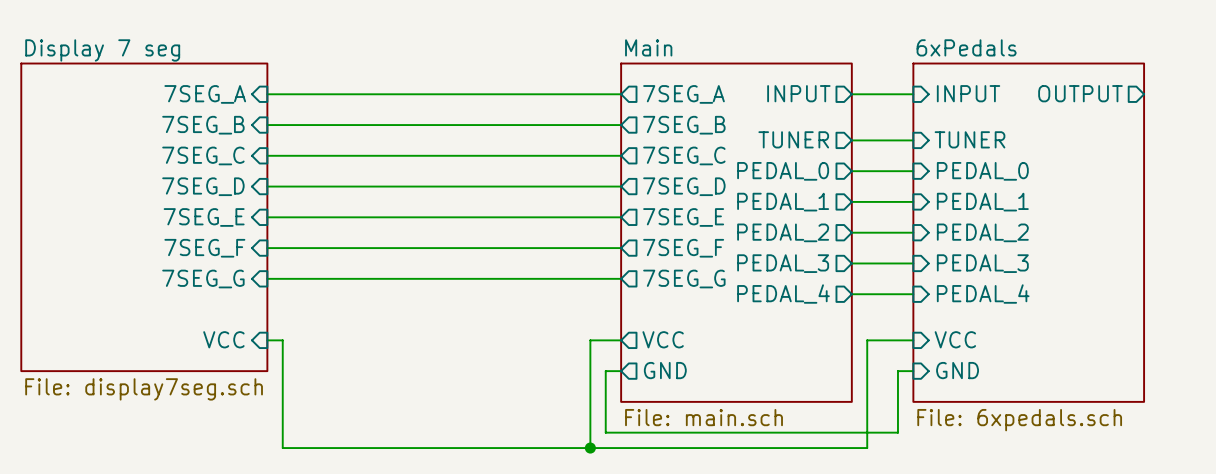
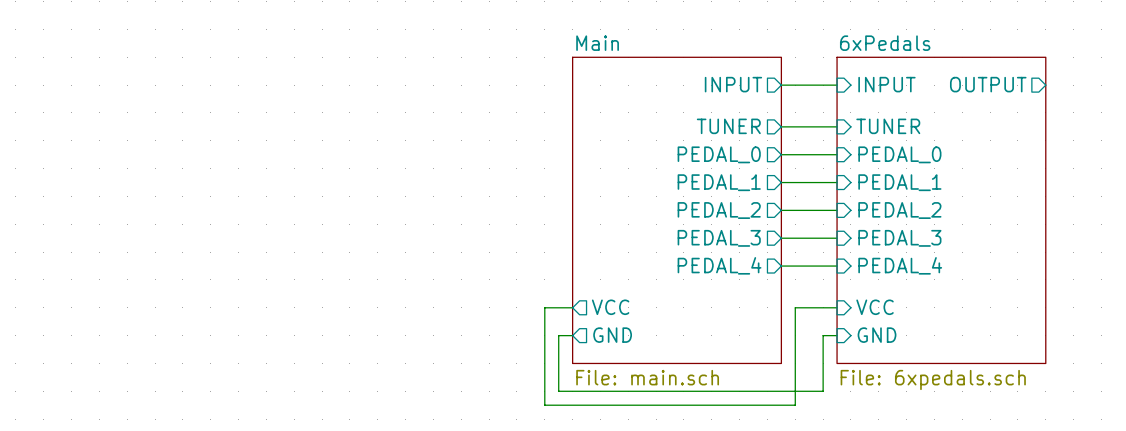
sheet pin: 7SEG_A (205, 94) -> none
wire: (267, 94) (621, 94) -> none
sheet pin: 7SEG_A (683, 94) -> none
sheet pin: 7SEG_B (203, 125) -> none
wire: (267, 125) (621, 125) -> none
sheet pin: 7SEG_B (684, 125) -> none
sheet pin: 7SEG_C (203, 155) -> none
wire: (267, 155) (621, 155) -> none
sheet pin: 7SEG_C (684, 155) -> none
sheet pin: 7SEG_D (203, 186) -> none
wire: (267, 186) (621, 186) -> none
sheet pin: 7SEG_D (684, 186) -> none
sheet Display 7 seg: File: display7seg.sch (144, 217) -> none
sheet pin: 7SEG_E (204, 217) -> none
wire: (267, 217) (621, 217) -> none
sheet pin: 7SEG_E (683, 217) -> none
sheet pin: 7SEG_F (204, 248) -> none
wire: (267, 248) (621, 248) -> none
sheet pin: 7SEG_F (683, 248) -> none
wire: (267, 278) (621, 278) -> none
sheet pin: 7SEG_G (203, 279) -> none
sheet pin: 7SEG_G (684, 279) -> none
sheet pin: VCC (223, 339) -> none
wire: (267, 340) (282, 340) (282, 448) (590, 448) -> none
junction: (590, 448) -> none

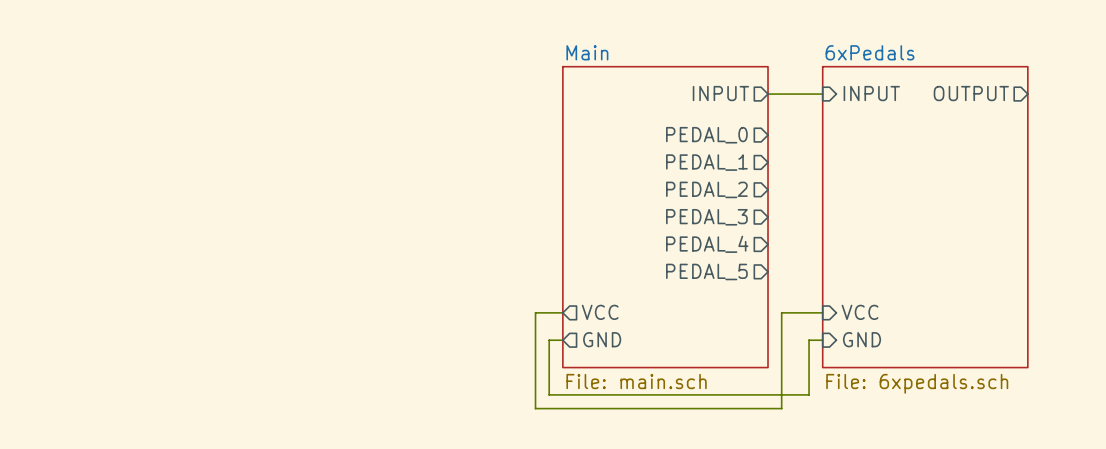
sheet pin: TUNER (728, 126) -> PEDAL_0 (706, 135)
wire: (781, 126) (837, 126) -> none
sheet pin: TUNER (888, 126) -> none
sheet pin: PEDAL_0 (719, 154) -> PEDAL_1 (706, 162)
wire: (781, 154) (837, 154) -> none
sheet pin: PEDAL_0 (899, 154) -> none
sheet pin: PEDAL_1 (719, 182) -> PEDAL_2 (706, 189)
wire: (781, 182) (837, 182) -> none
sheet pin: PEDAL_1 (899, 182) -> none
sheet pin: PEDAL_2 (719, 210) -> PEDAL_3 (706, 217)
wire: (781, 210) (837, 210) -> none
sheet pin: PEDAL_2 (899, 210) -> none
sheet pin: PEDAL_3 (719, 238) -> PEDAL_4 (707, 244)
wire: (781, 238) (837, 238) -> none
sheet pin: PEDAL_3 (899, 238) -> none
sheet pin: PEDAL_4 (719, 265) -> PEDAL_5 (706, 271)
sheet pin: PEDAL_4 (900, 265) -> none
wire: (781, 266) (837, 266) -> none

